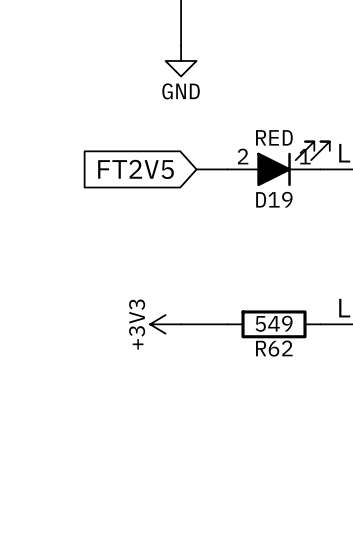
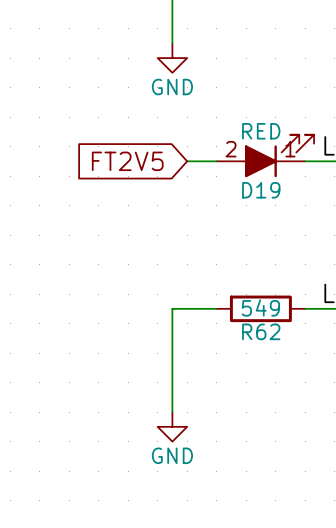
power symbol: +3V3 (165, 324) -> none
wire: none -> (172, 308) (172, 412)
power symbol: none -> GND (172, 426)

